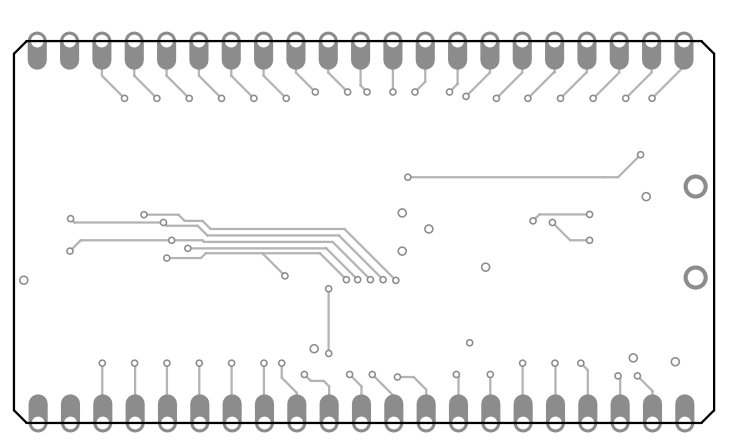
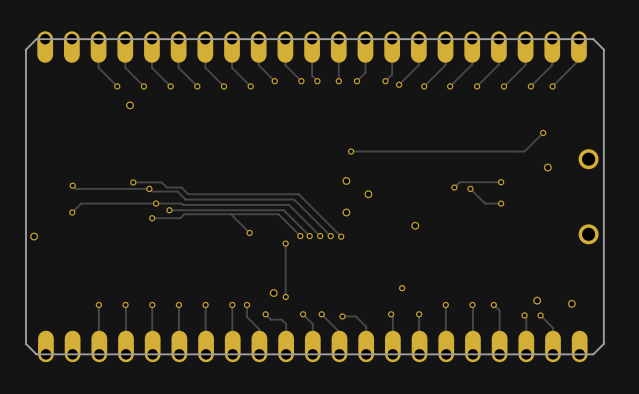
via: none -> (129, 105)

